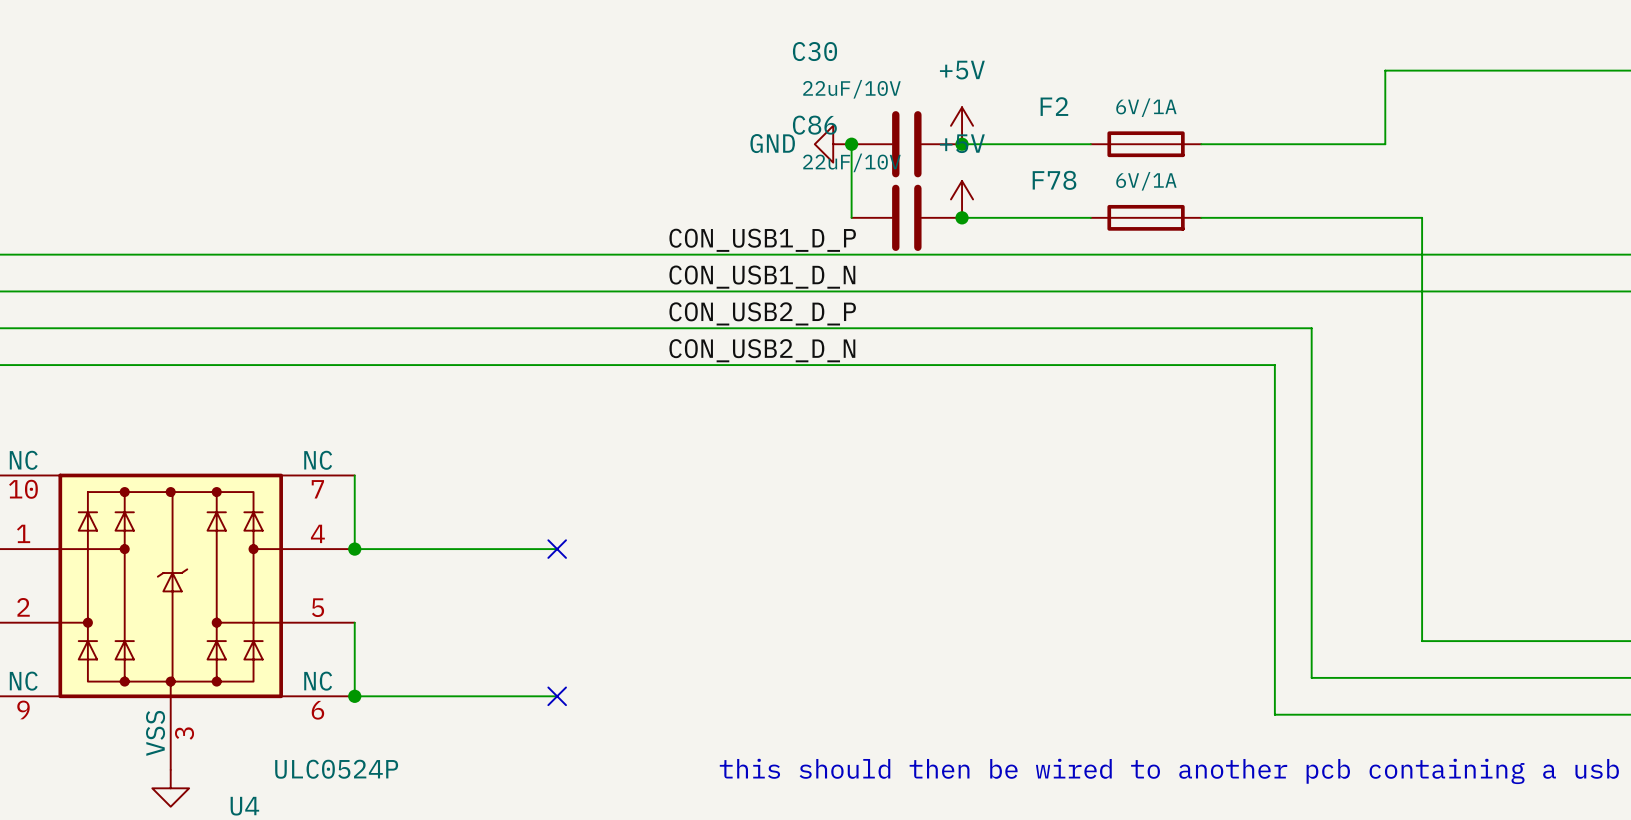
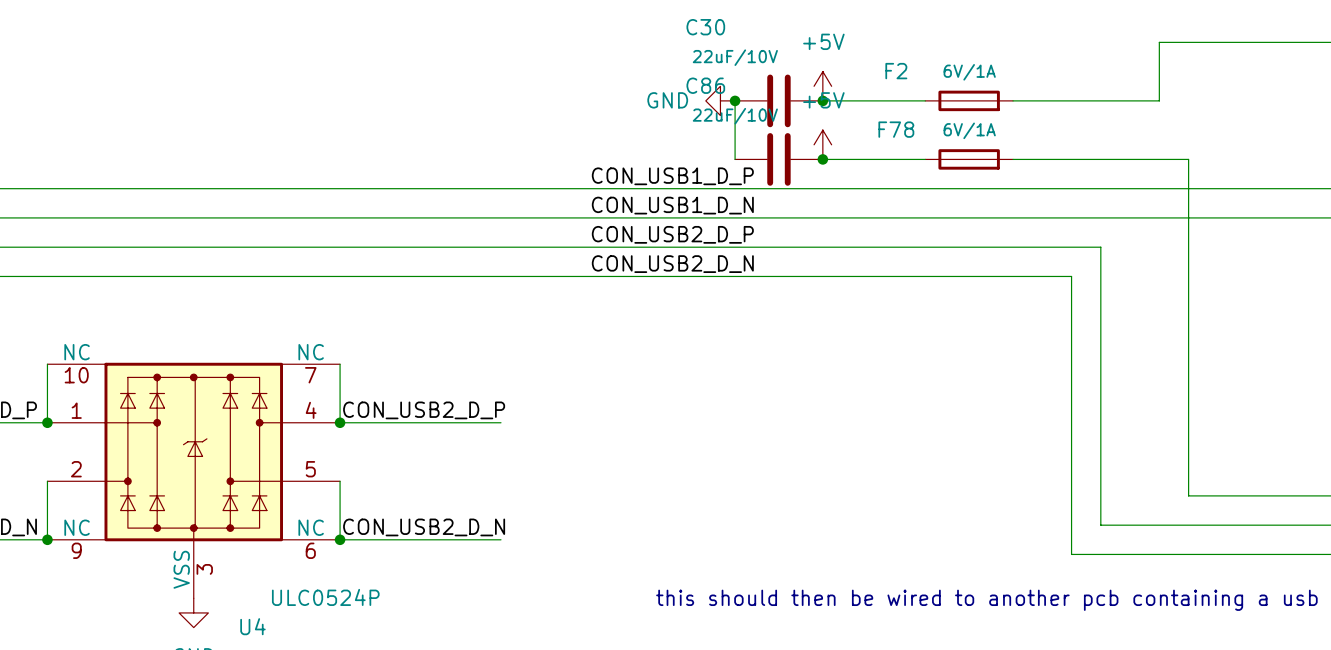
label: none -> CON_USB2_D_P (424, 410)
no-connect mark: (557, 549) -> none
label: none -> CON_USB2_D_N (424, 527)
no-connect mark: (557, 696) -> none

